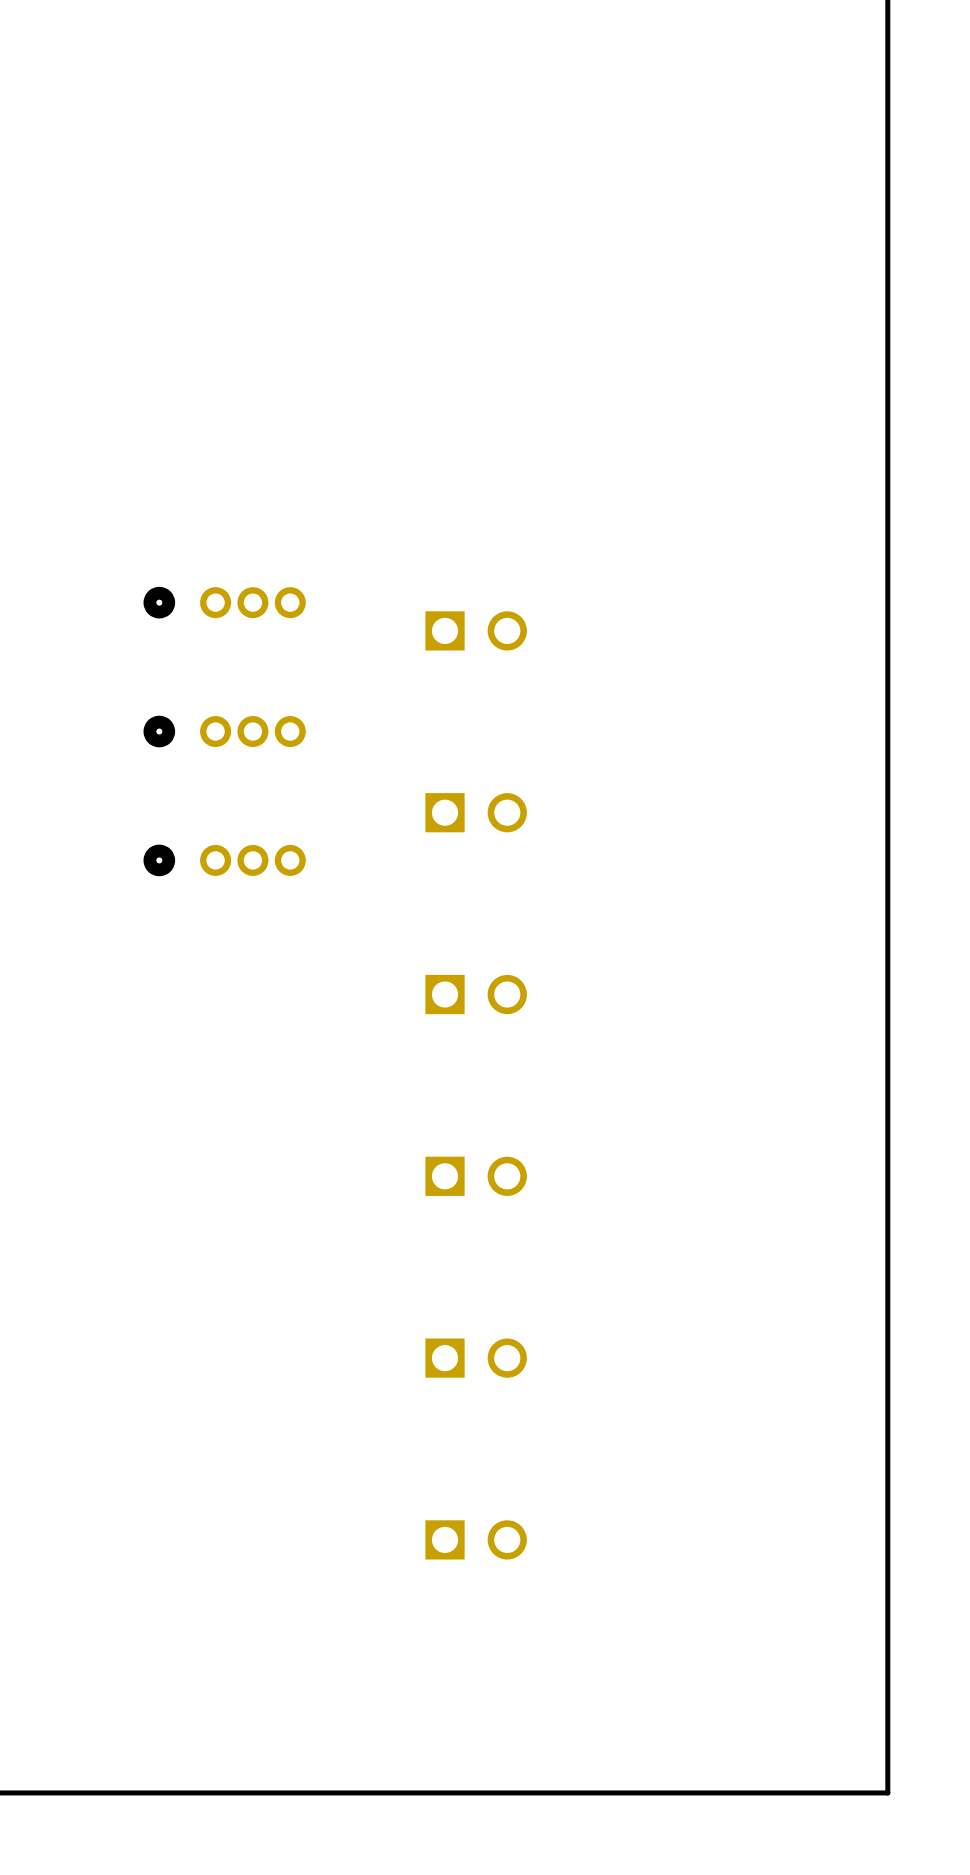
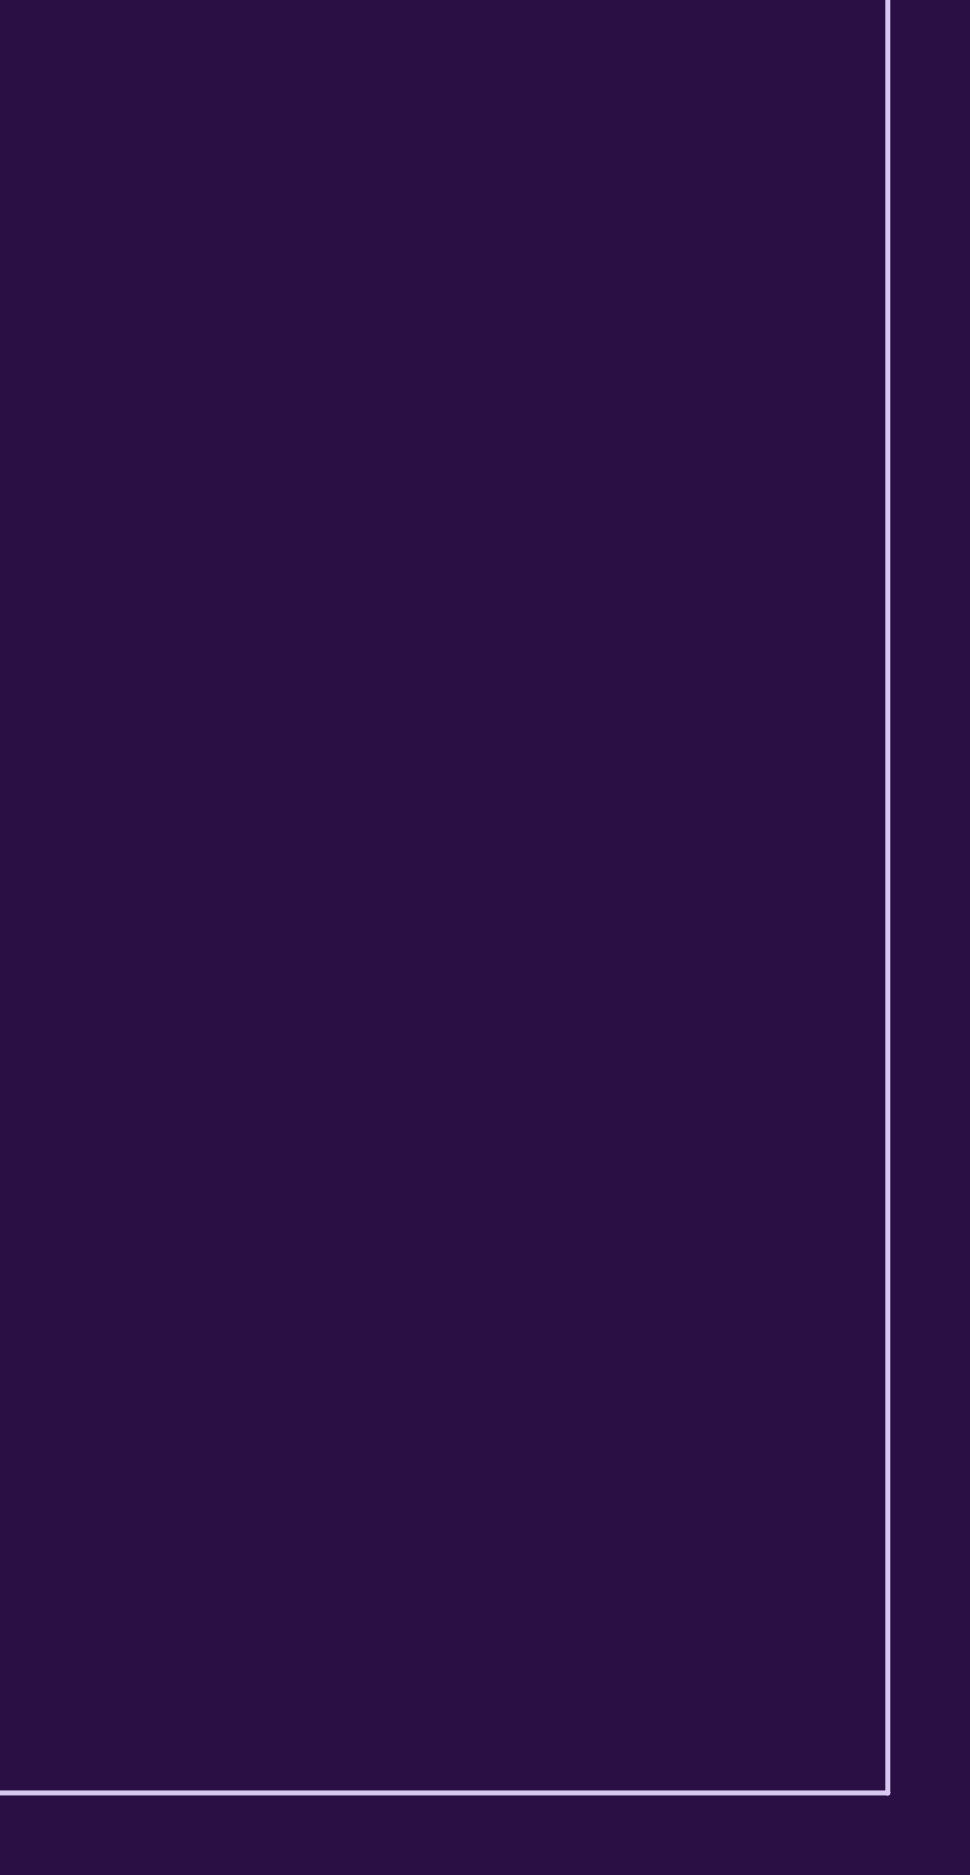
part: (224, 602) -> none
part: (476, 630) -> none
part: (224, 731) -> none
part: (476, 812) -> none
part: (224, 860) -> none
part: (476, 994) -> none
part: (476, 1176) -> none
part: (476, 1358) -> none
part: (476, 1539) -> none

